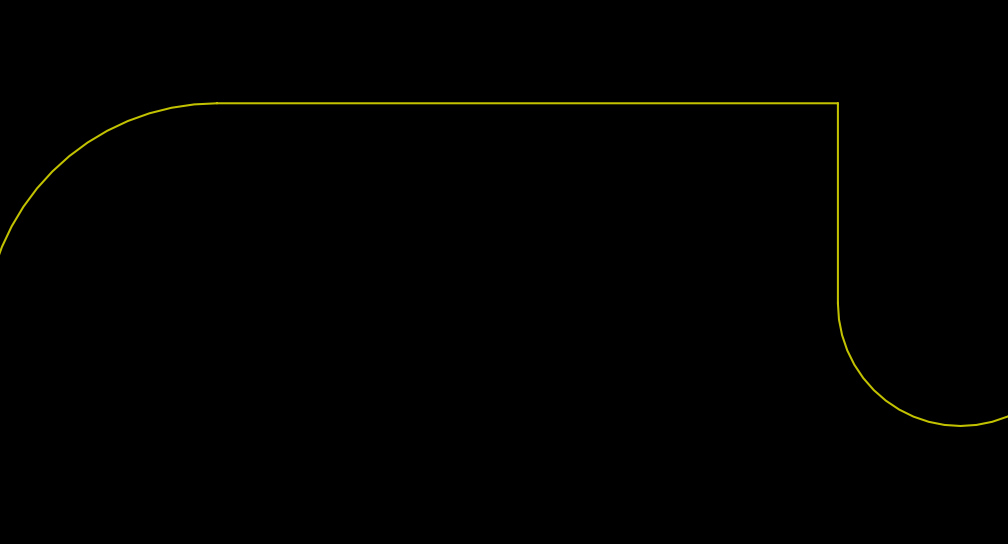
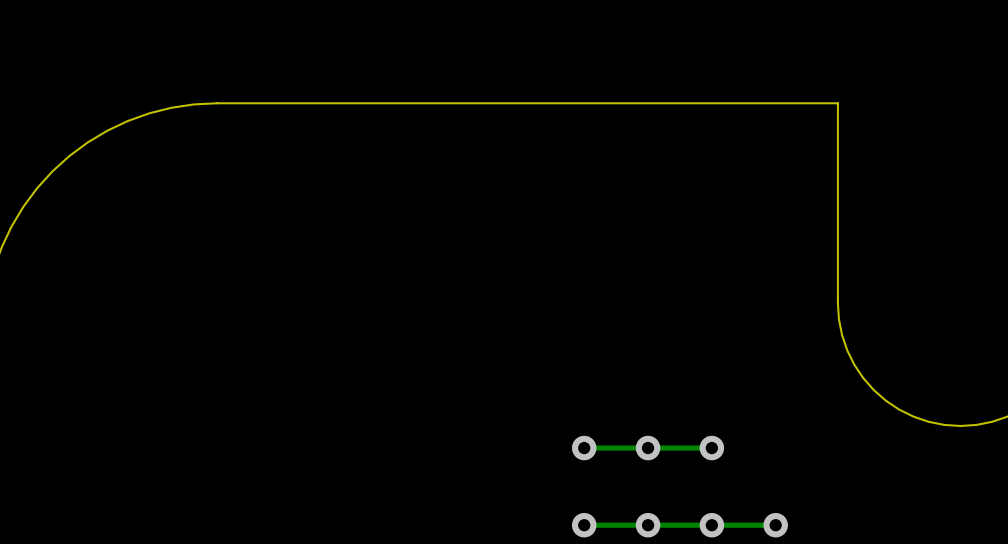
via: none -> (584, 448)
via: none -> (648, 448)
track: none -> (711, 448) (584, 448)
via: none -> (711, 448)
via: none -> (584, 525)
via: none -> (648, 525)
via: none -> (711, 525)
track: none -> (775, 525) (584, 525)
via: none -> (775, 525)

